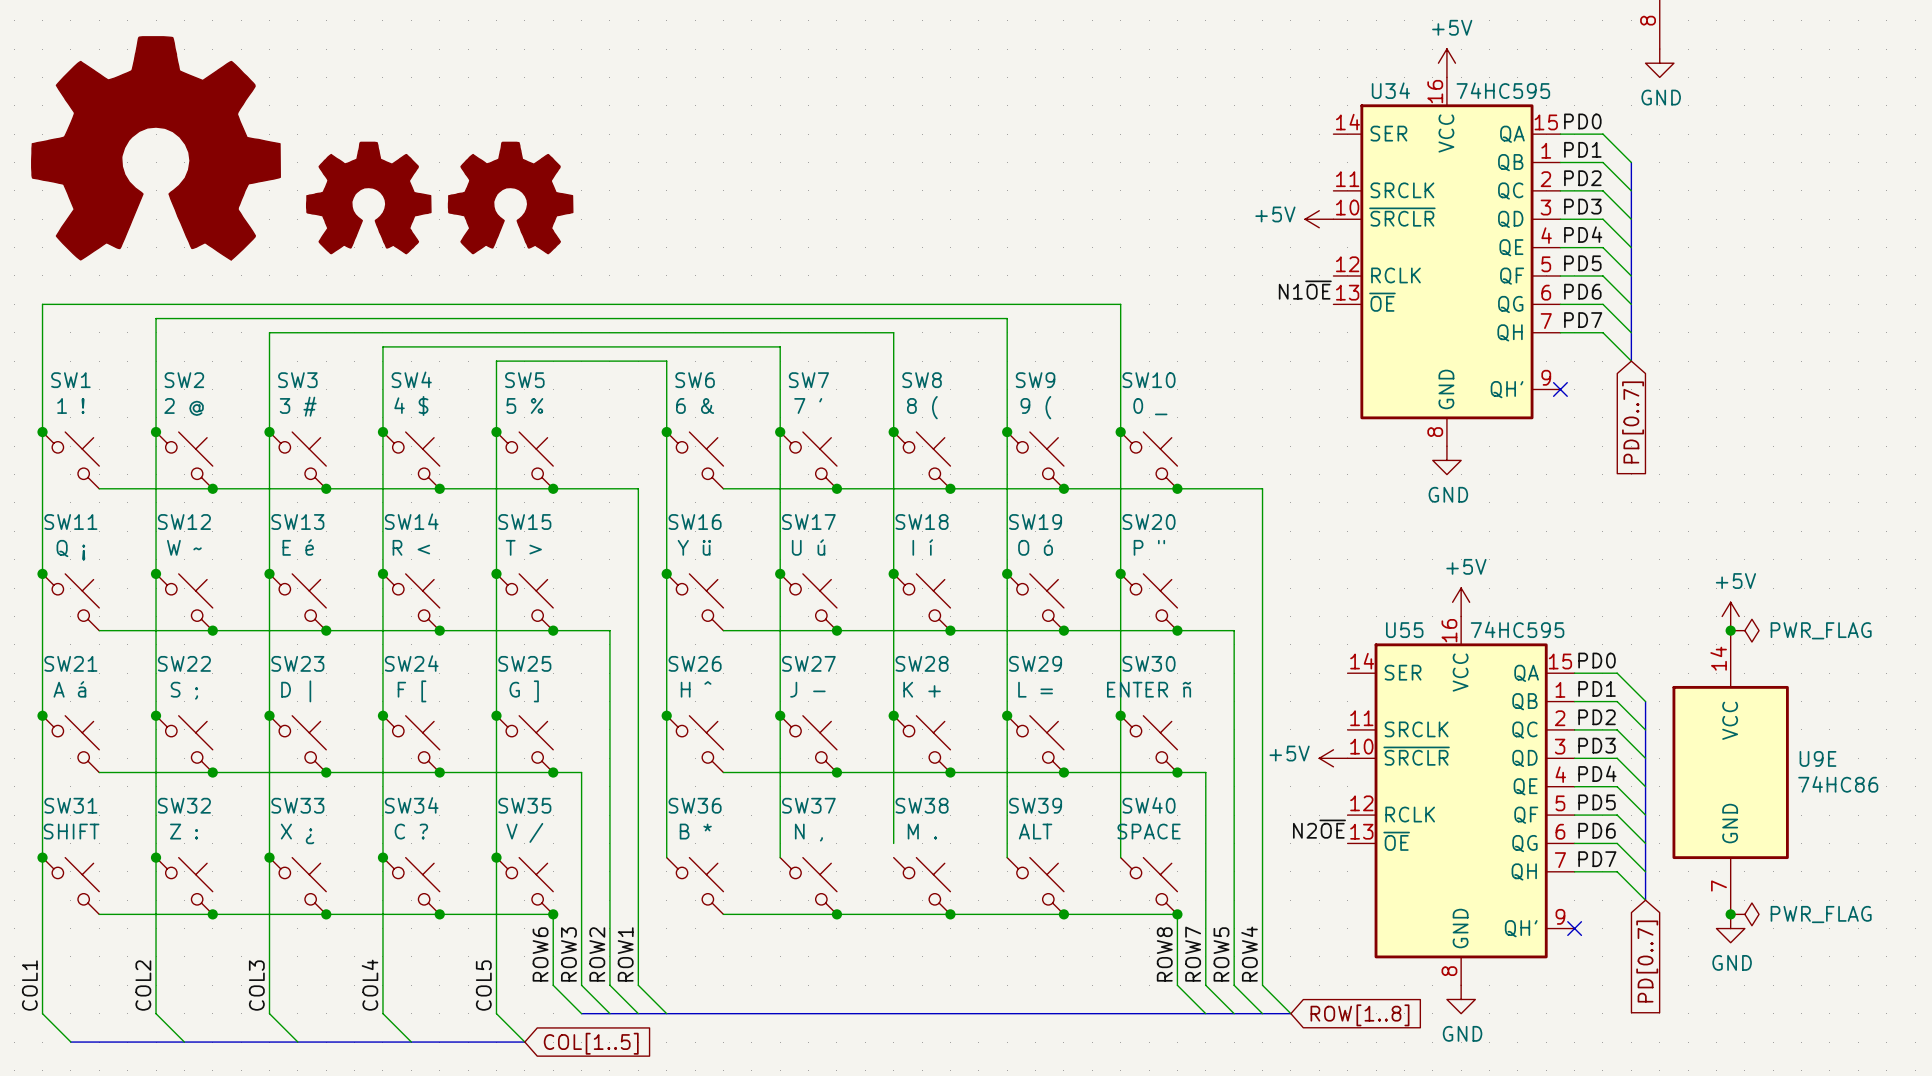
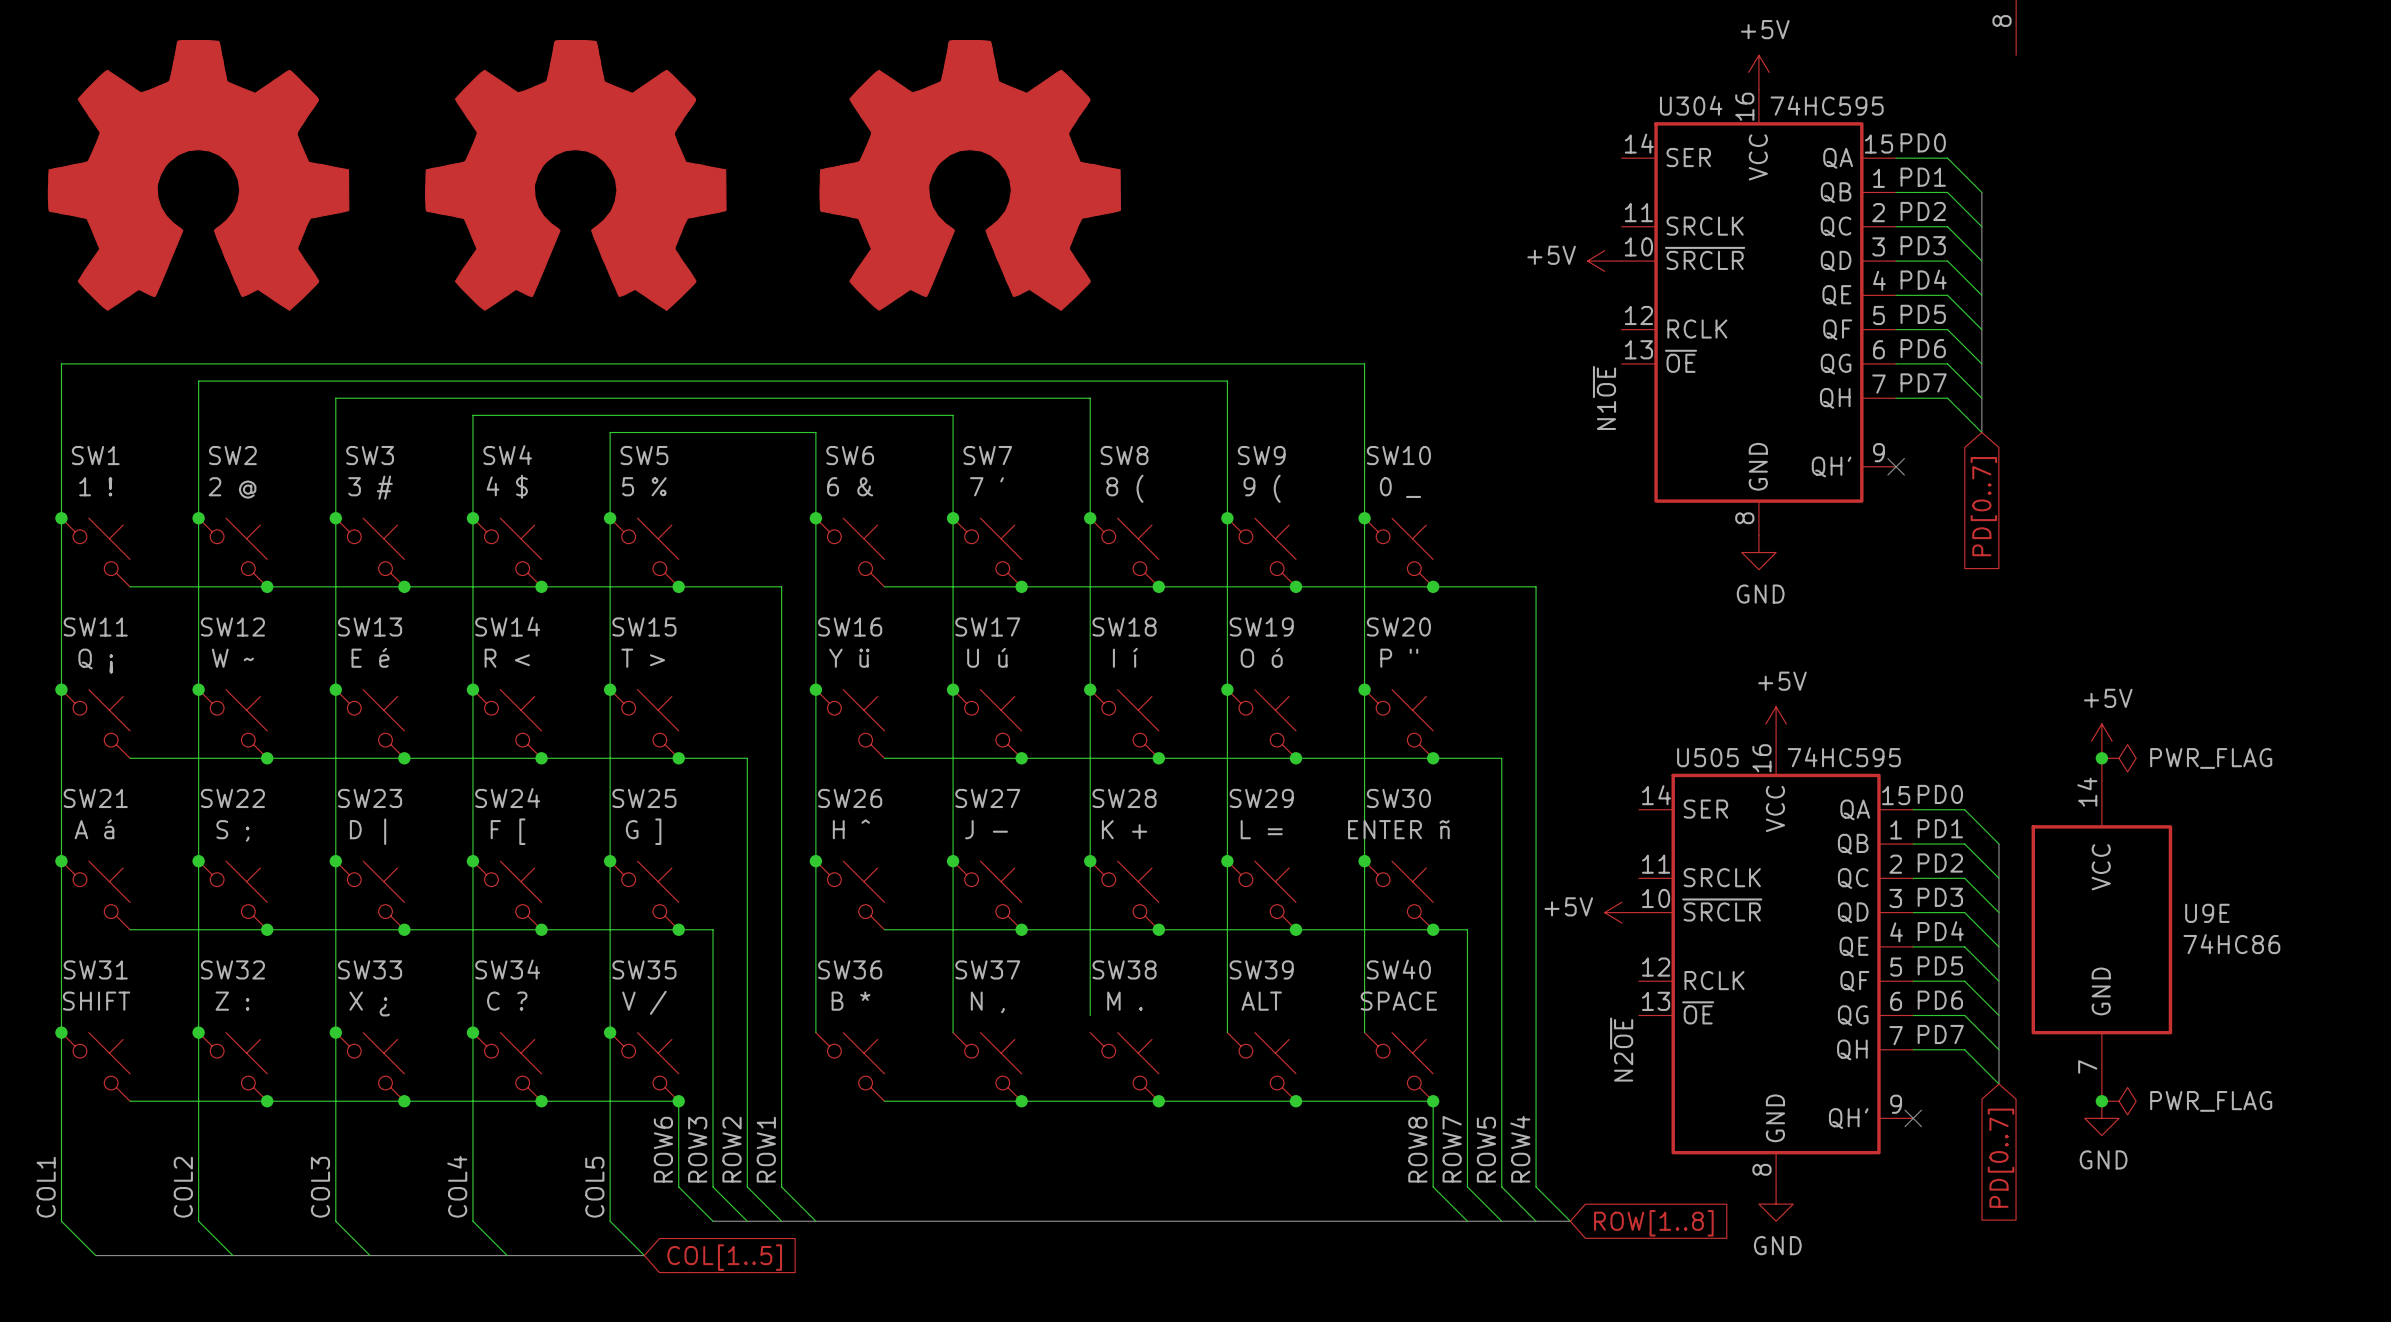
power symbol: GND (1659, 63) -> none
U34 name: U34 (1390, 90) -> U304 (1691, 105)
part: none -> (575, 175)
part: none -> (970, 175)
part: (368, 197) -> none
part: (510, 197) -> none
label rotation: 0° (1305, 290) -> 90° counterclockwise (1604, 397)
U55 name: U55 (1404, 630) -> U505 (1707, 757)
label rotation: 0° (1319, 829) -> 90° counterclockwise (1621, 1049)

